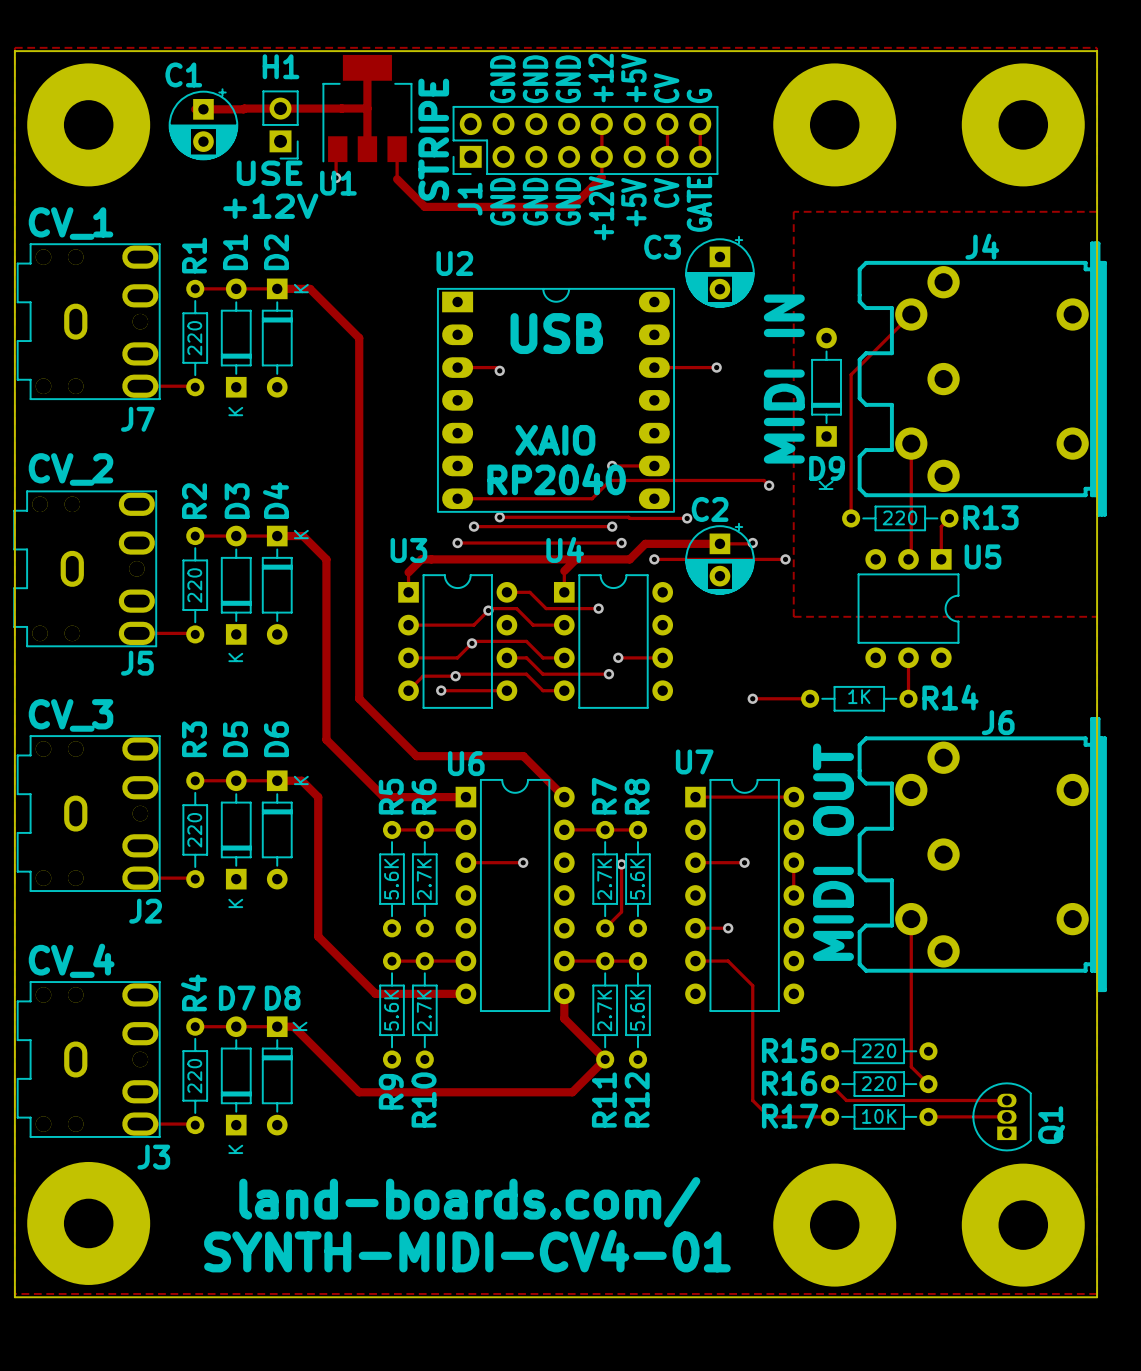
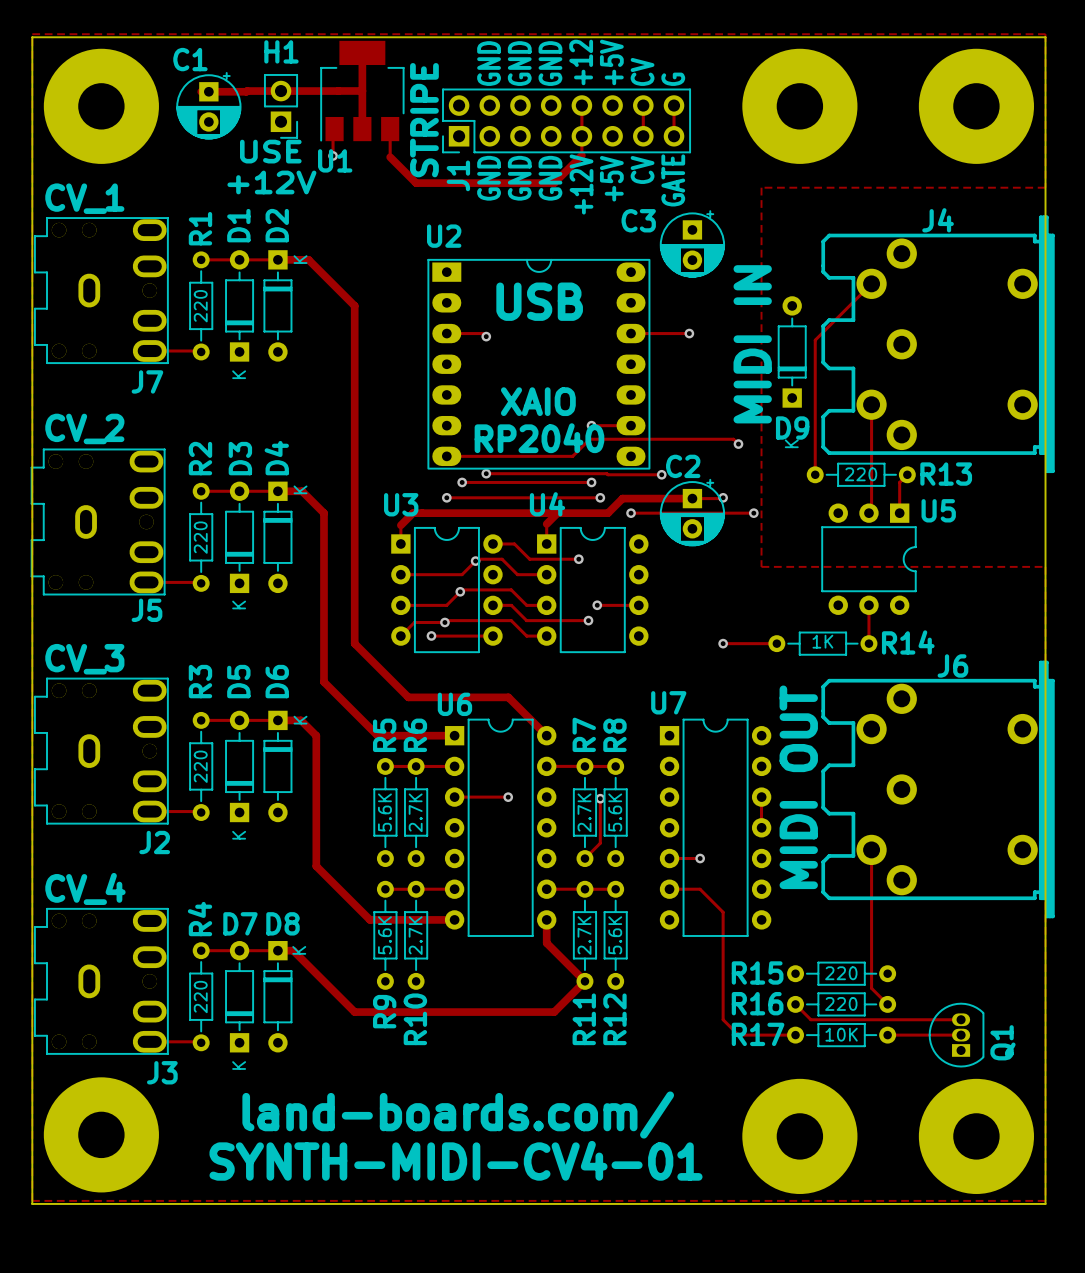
track: (695, 797) (793, 797) -> none
track: (695, 862) (744, 862) -> none
via: (744, 862) -> none

